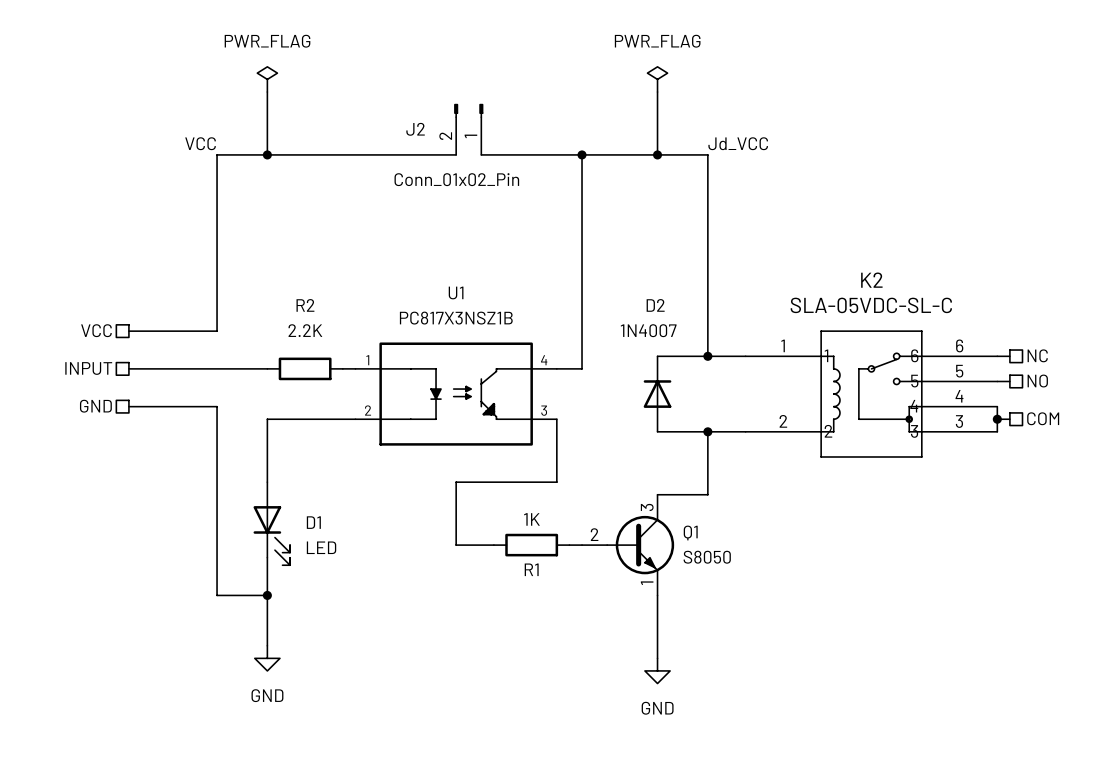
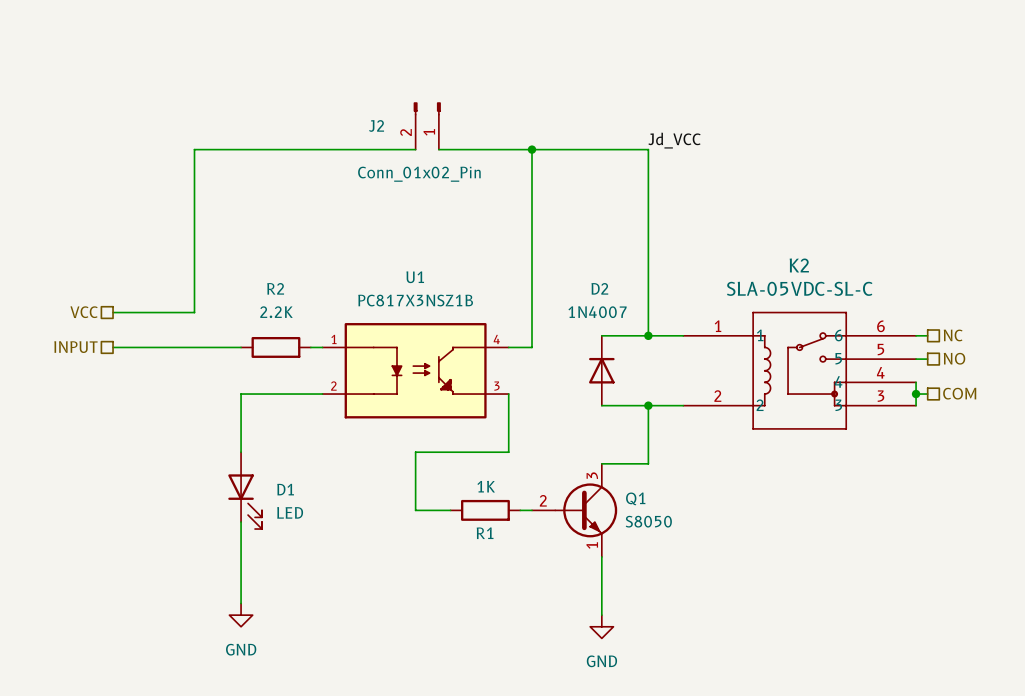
power symbol: PWR_FLAG (267, 79) -> none
power symbol: PWR_FLAG (657, 79) -> none
wire: (267, 92) (267, 154) -> none
wire: (657, 92) (657, 154) -> none
label: VCC (200, 143) -> none
junction: (267, 154) -> none
junction: (657, 154) -> none
hierarchical label: GND (95, 406) -> none
wire: (128, 406) (217, 406) (217, 595) (267, 595) -> none
junction: (267, 595) -> none

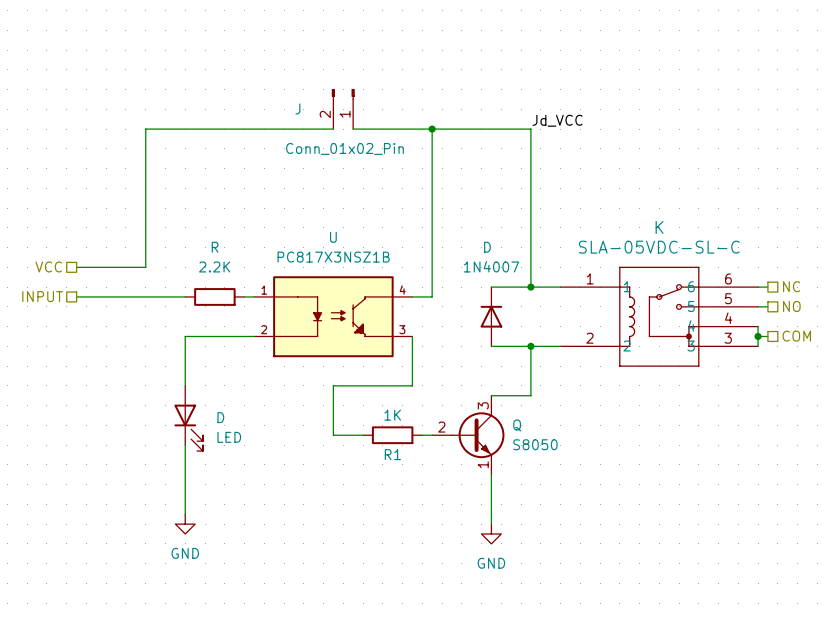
J2 name: J2 (376, 125) -> J (297, 108)
K2 name: K2 (799, 265) -> K (659, 227)
U1 name: U1 (415, 277) -> U (333, 237)
R2 name: R2 (275, 288) -> R (215, 247)
D2 name: D2 (599, 288) -> D (487, 247)
D1 name: D1 (285, 489) -> D (220, 417)
Q1 name: Q1 (635, 498) -> Q (517, 425)

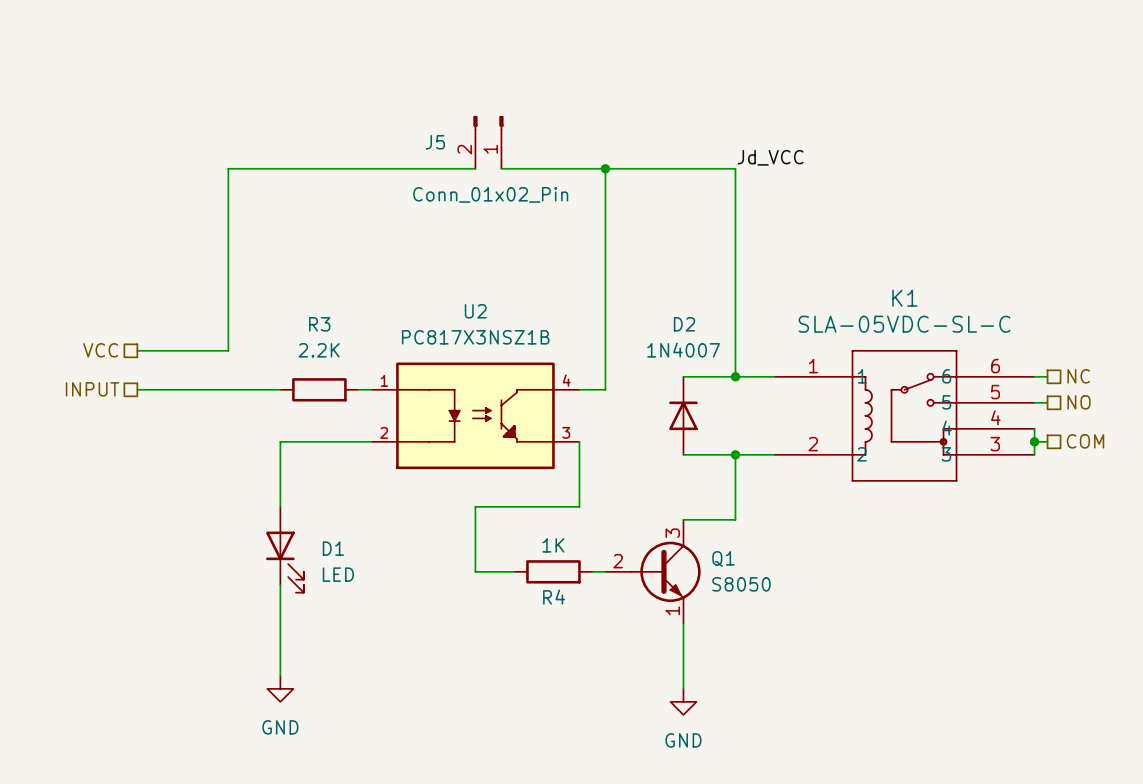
J name: J (297, 108) -> J5 (435, 142)
K name: K (659, 227) -> K1 (904, 298)
U name: U (333, 237) -> U2 (475, 311)
R name: R (215, 247) -> R3 (319, 324)
D name: D (487, 247) -> D2 (684, 324)
D name: D (220, 417) -> D1 (333, 548)
Q name: Q (517, 425) -> Q1 (723, 558)
R1 name: R1 (392, 454) -> R4 (554, 597)

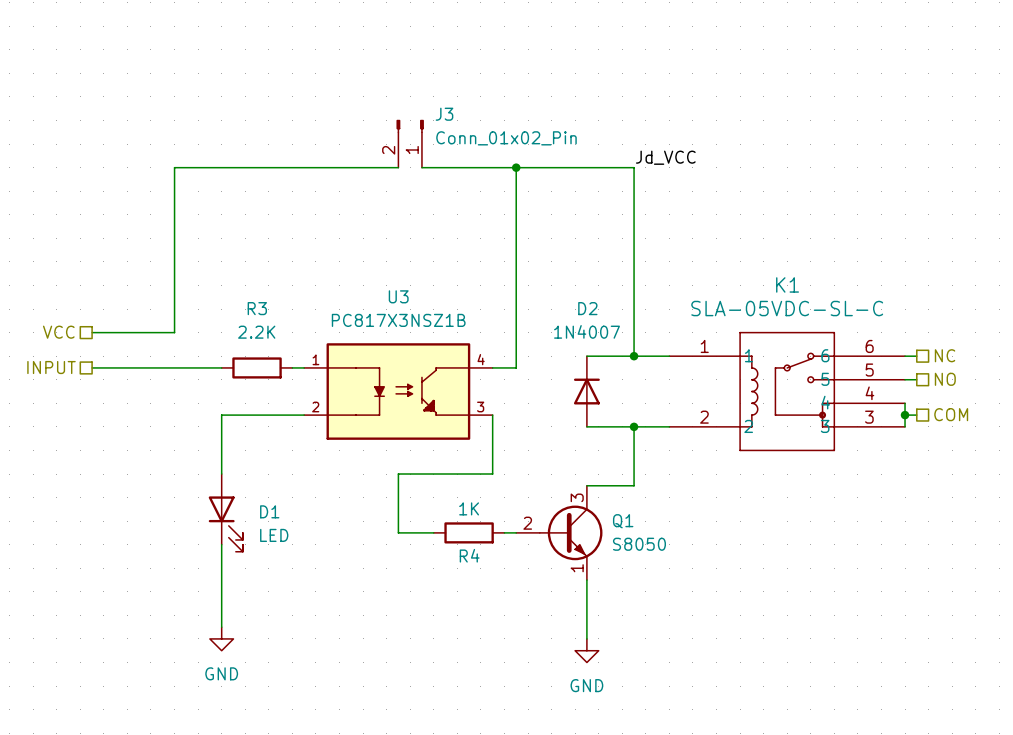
J5 name: J5 (435, 142) -> J3 (444, 114)
J5 value position: Conn_01x02_Pin (490, 194) -> Conn_01x02_Pin (506, 138)
U2 name: U2 (475, 311) -> U3 (398, 296)

